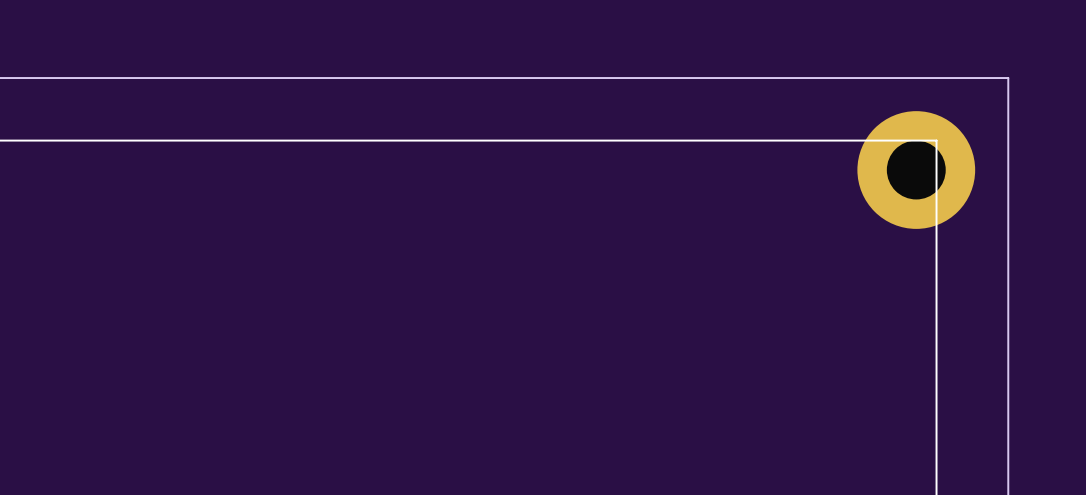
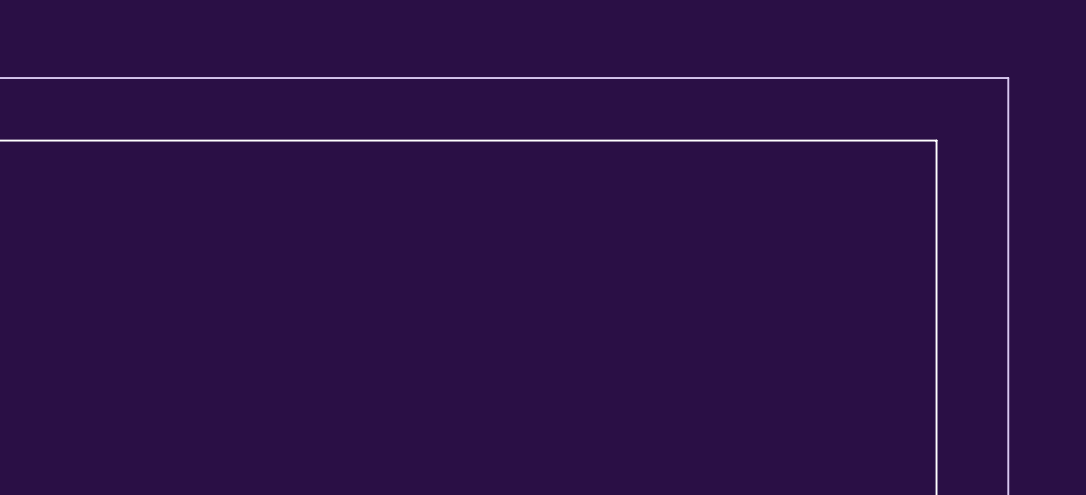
part: (916, 170) -> none

